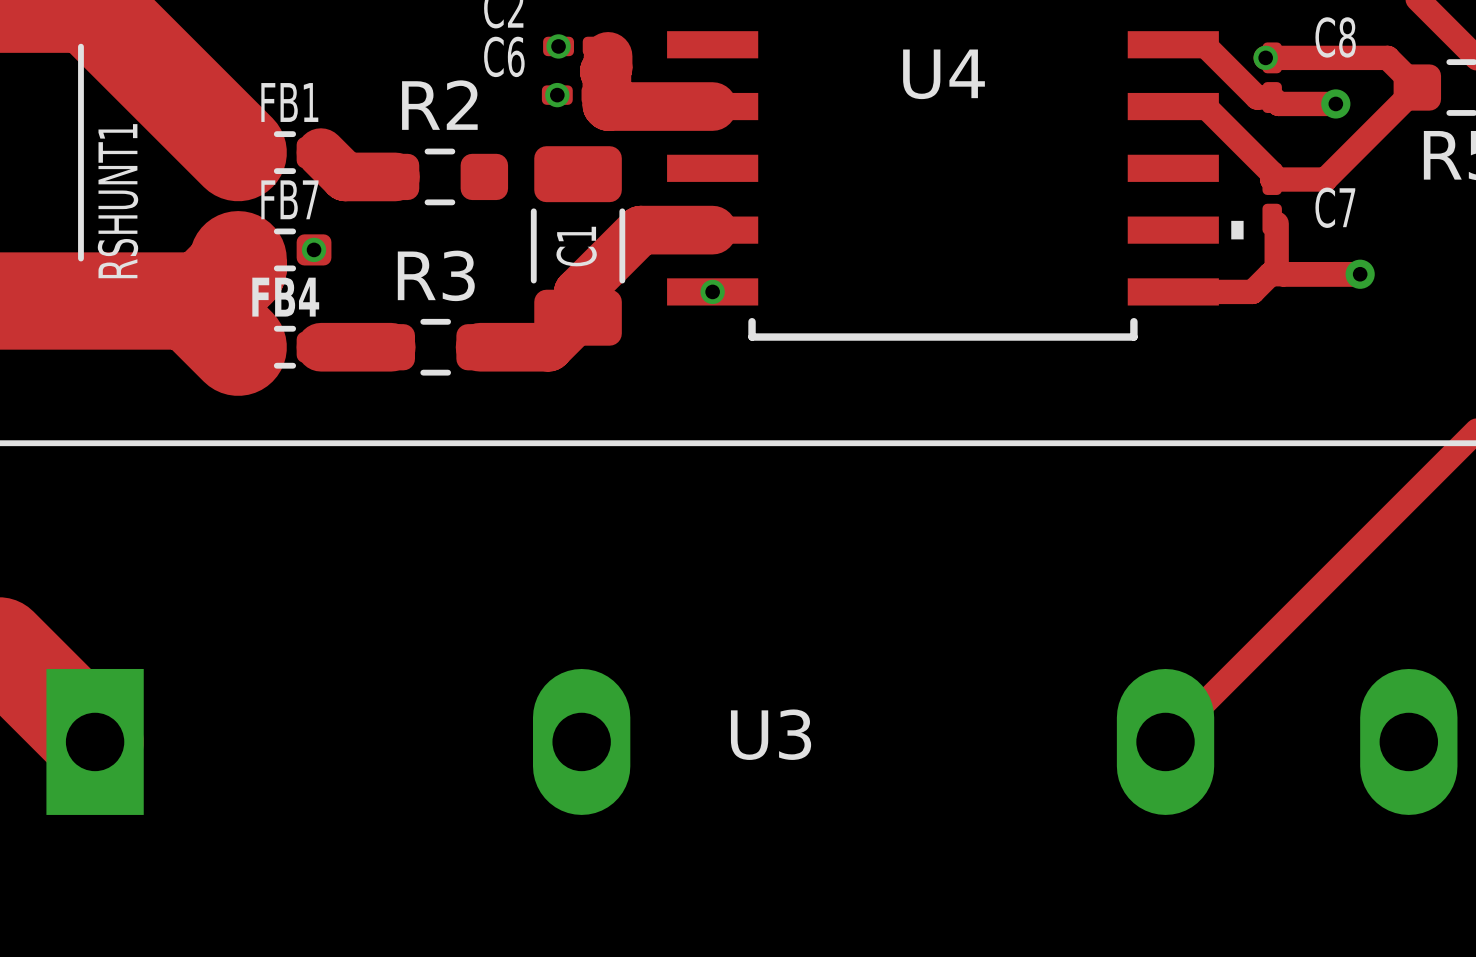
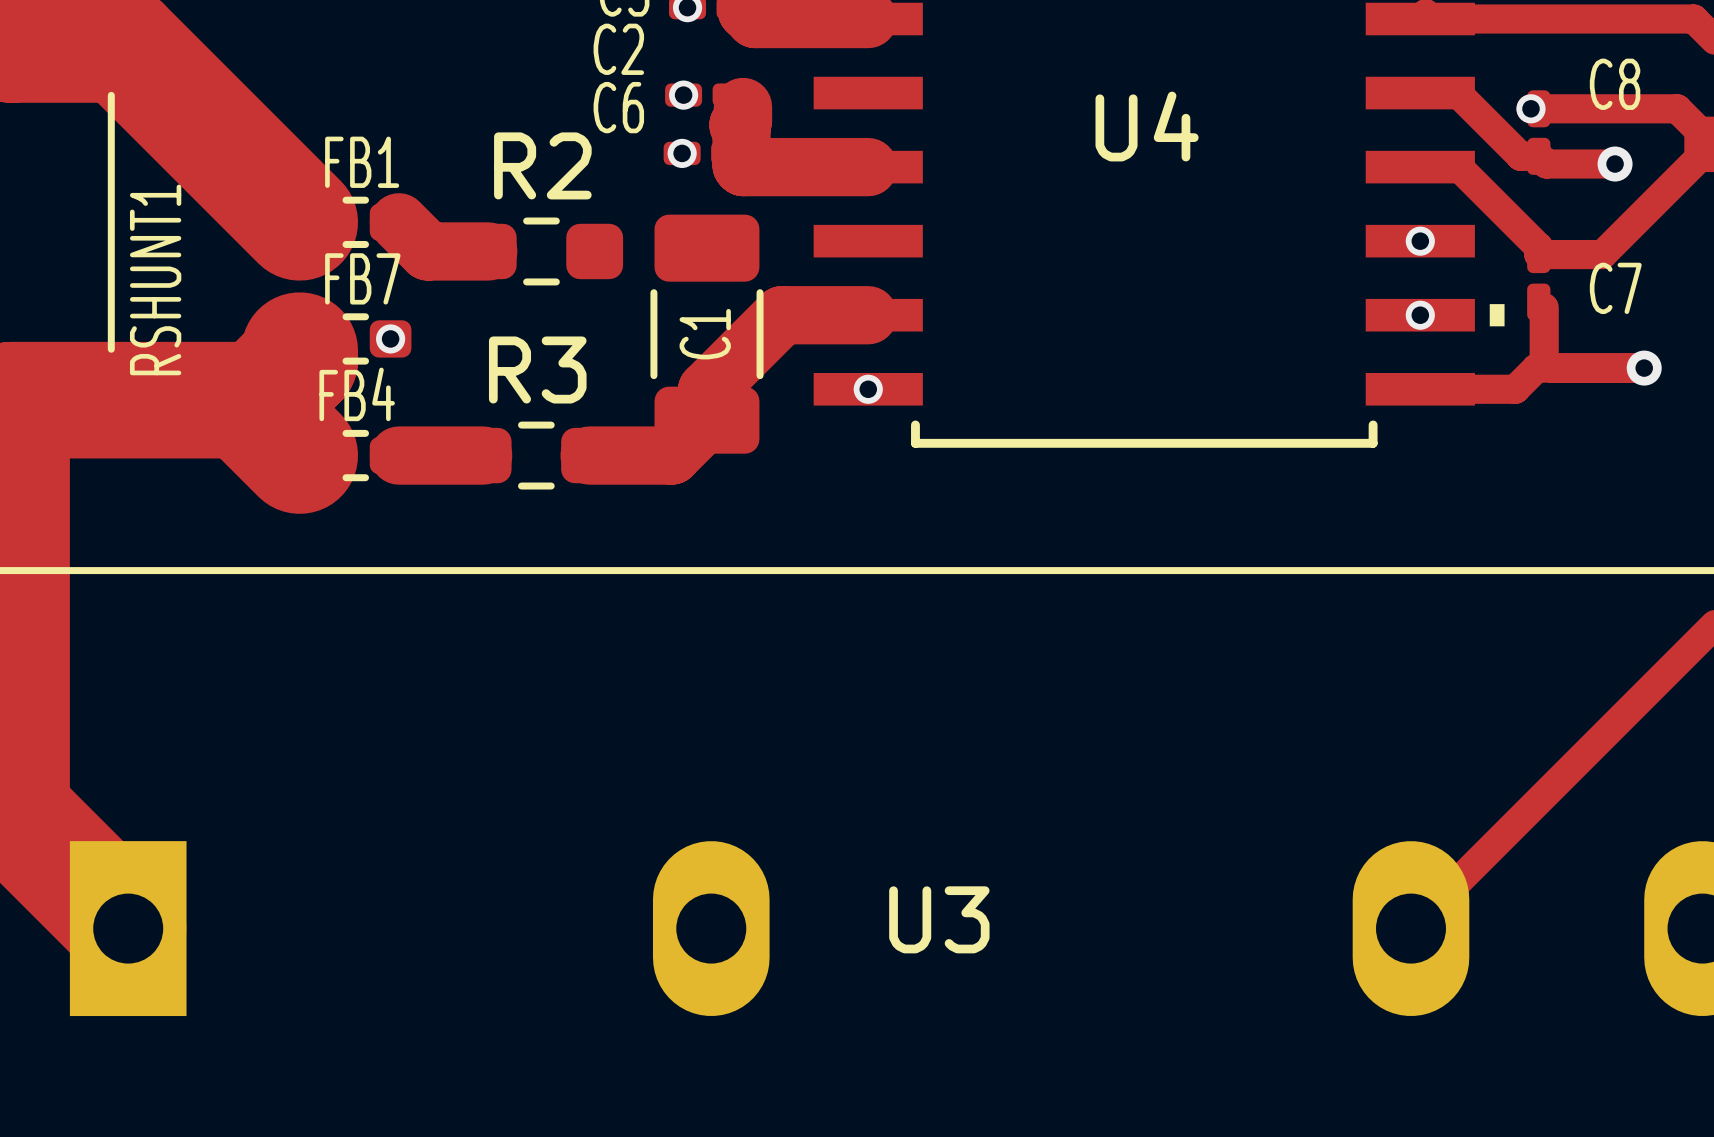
via: none -> (1420, 241)
via: none -> (1420, 315)

